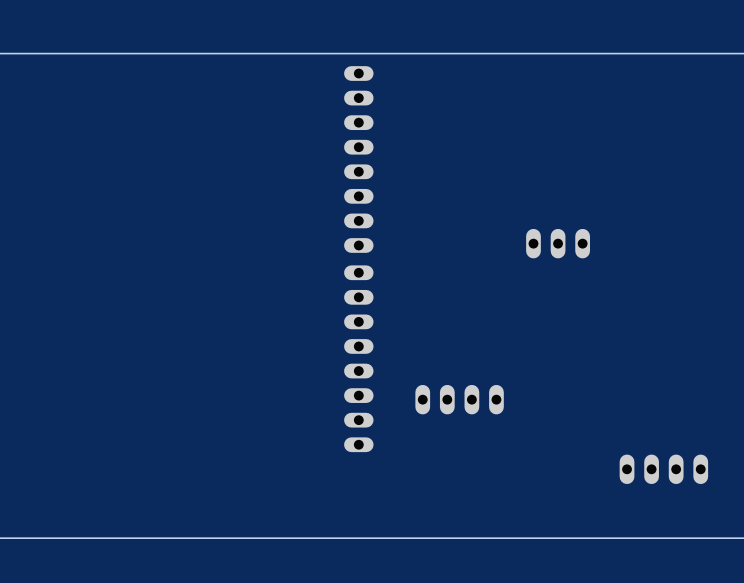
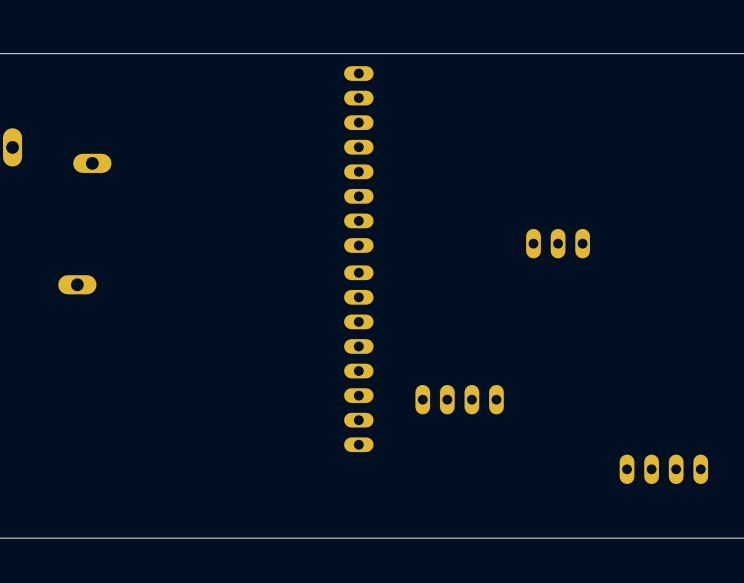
part: none -> (12, 147)
part: none -> (92, 163)
part: none -> (77, 284)

